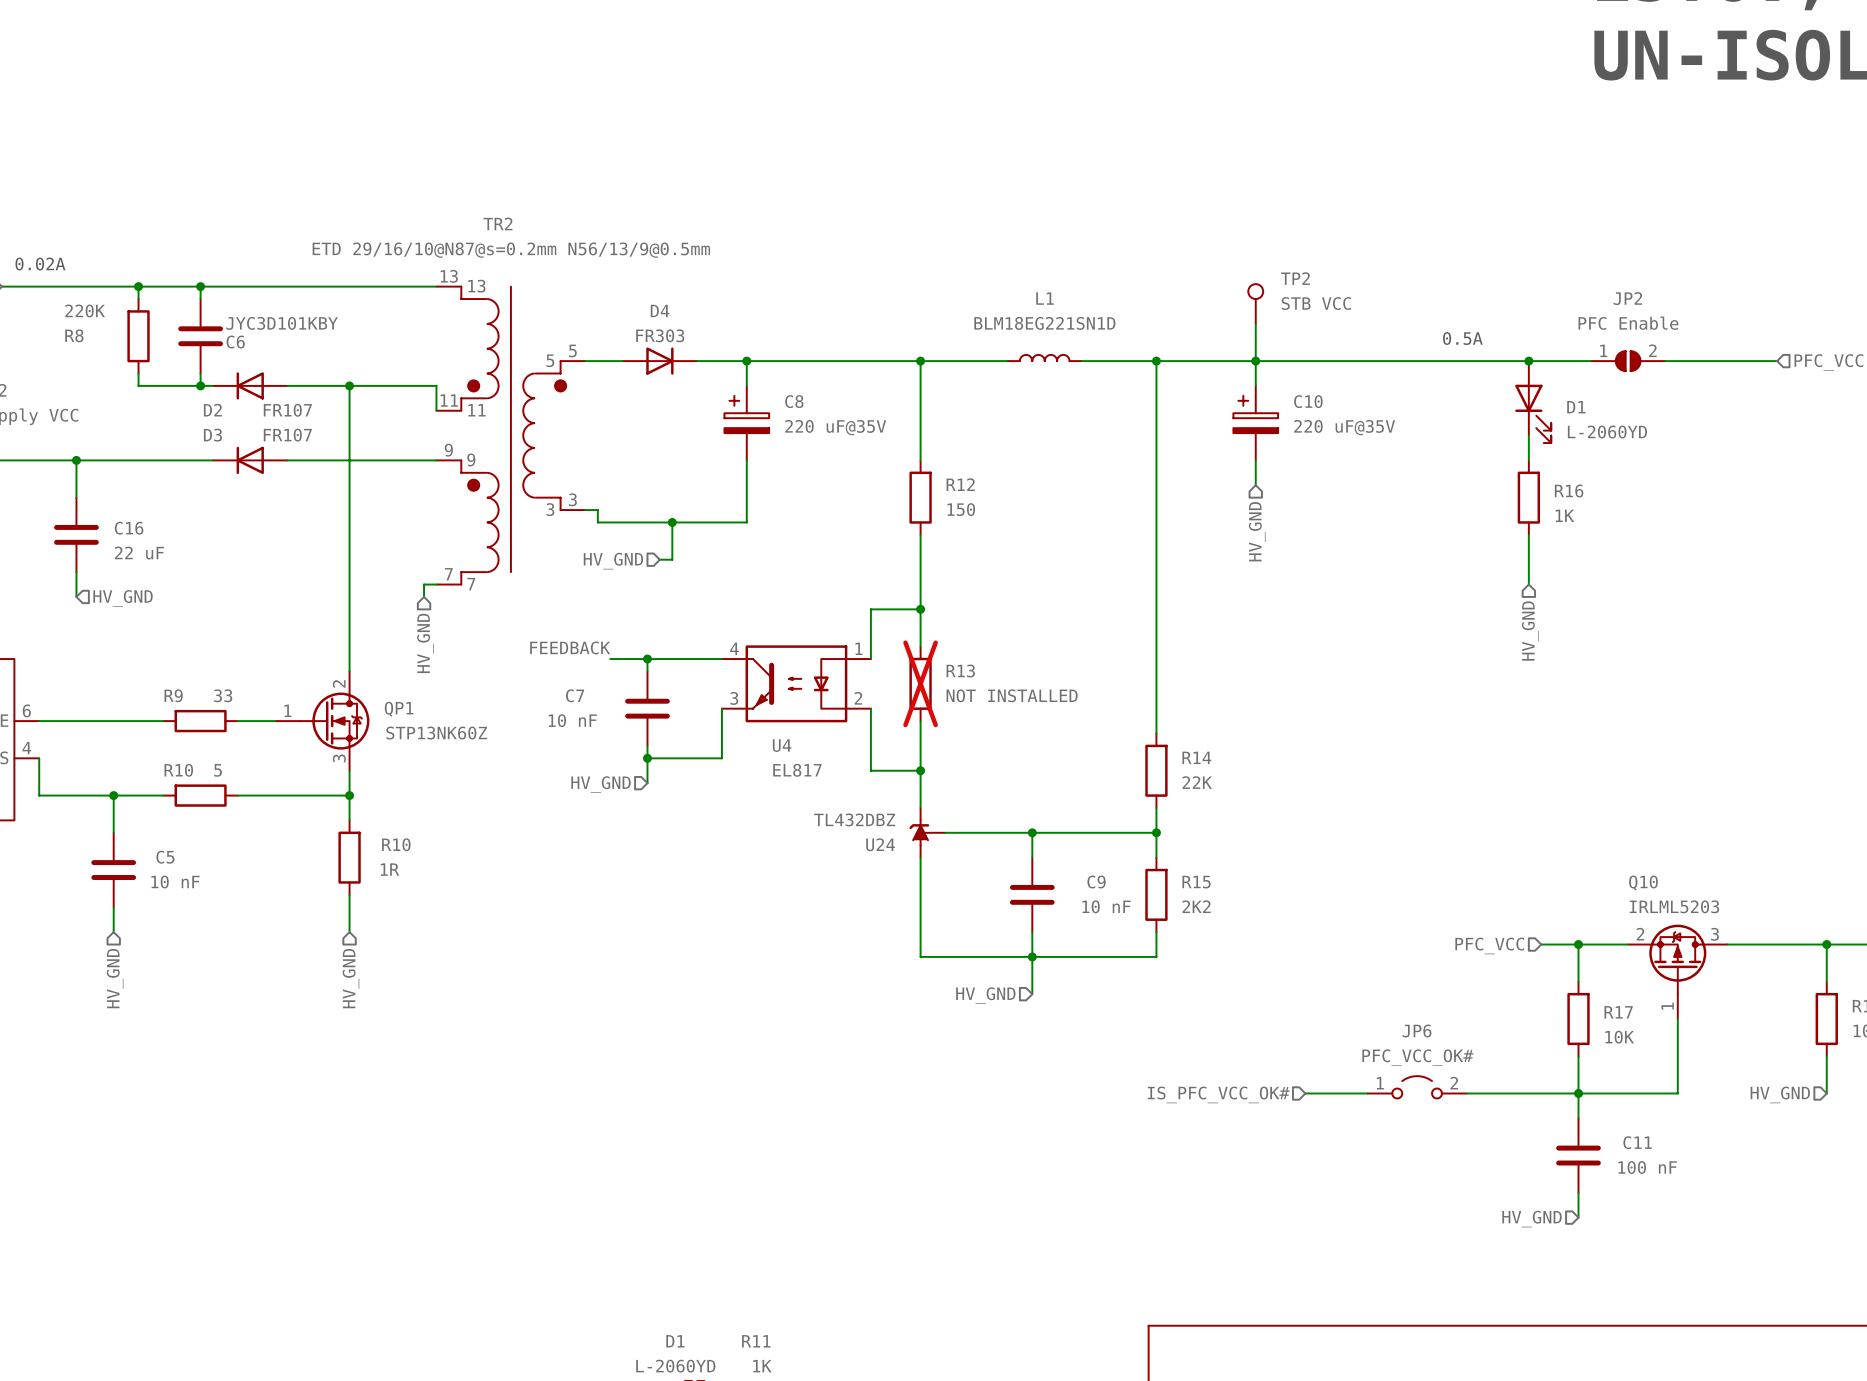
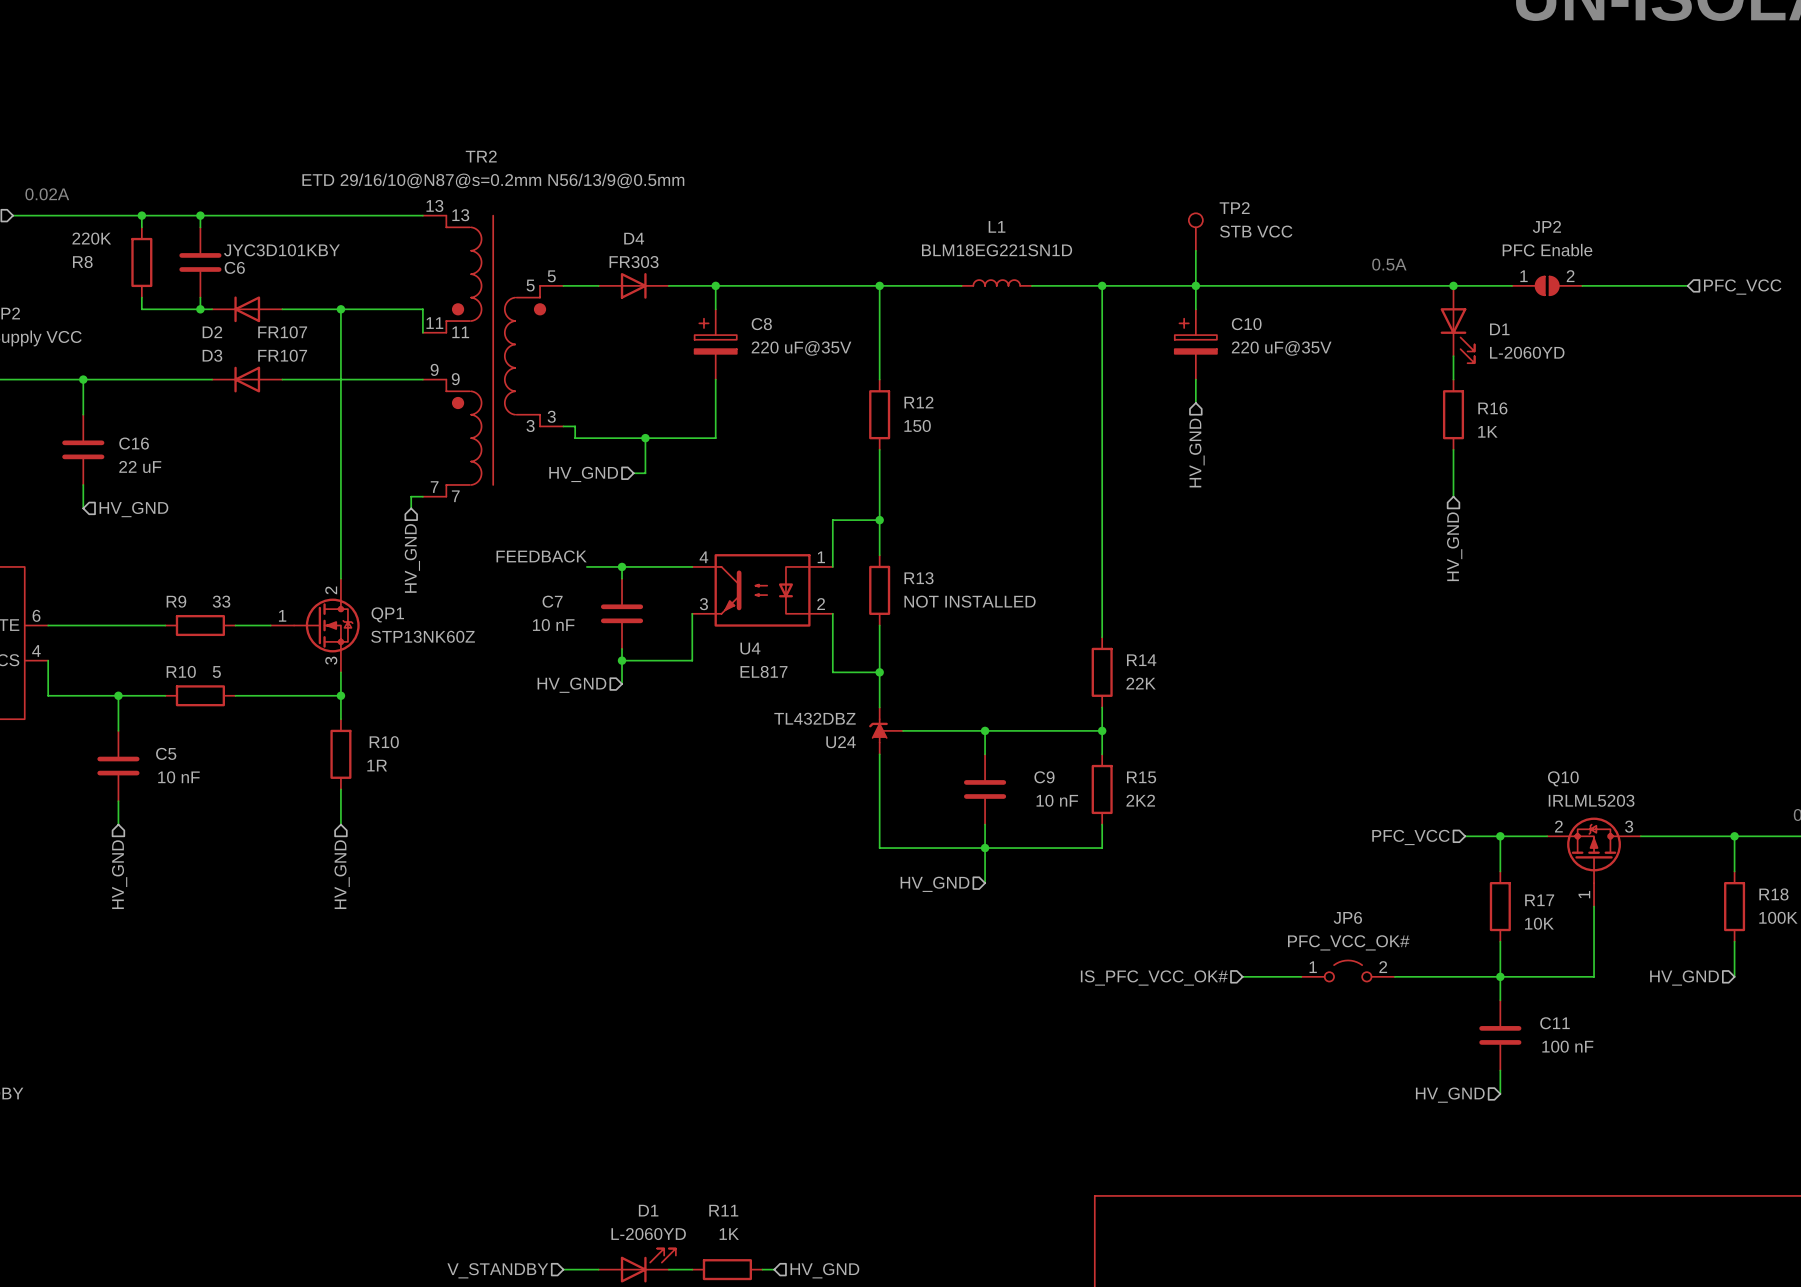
R13 do-not-place cross: (920, 683) -> none

